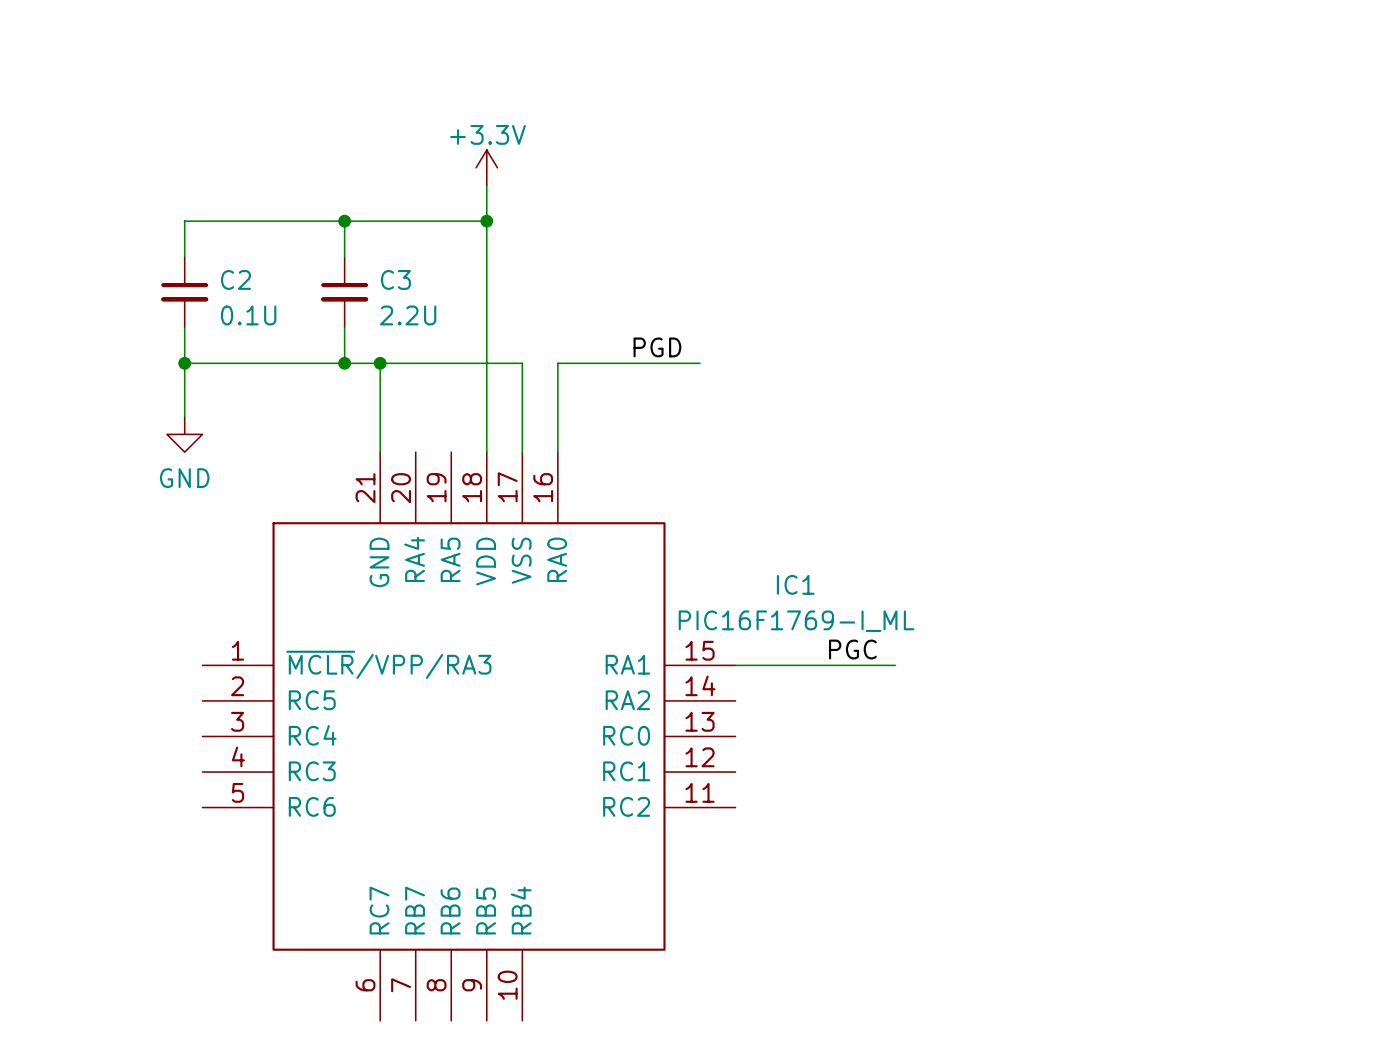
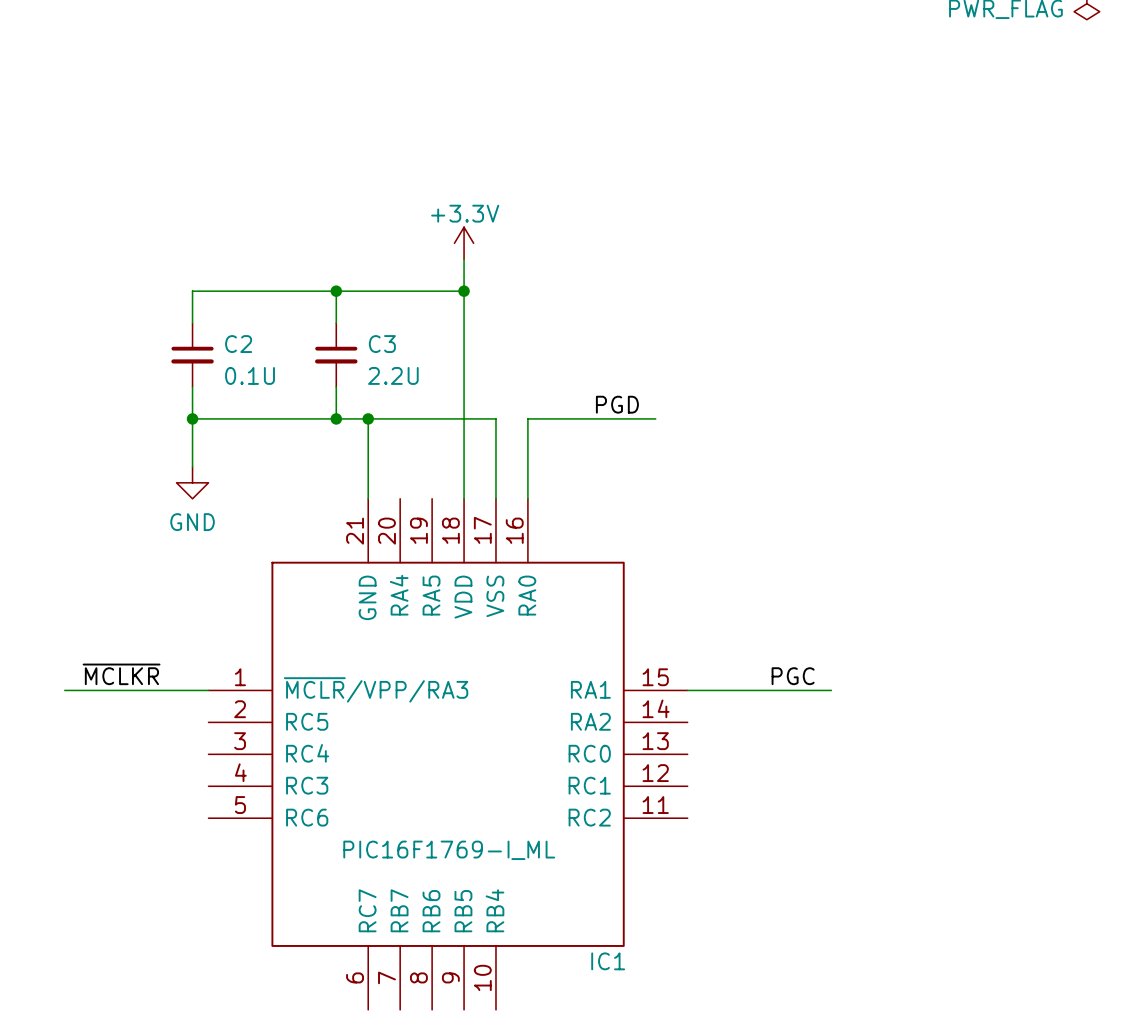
IC1 name position: IC1 (795, 584) -> IC1 (608, 961)
IC1 value position: PIC16F1769-I_ML (796, 621) -> PIC16F1769-I_ML (449, 850)
label: none -> ~{MCLKR} (121, 674)
wire: none -> (64, 690) (208, 690)

